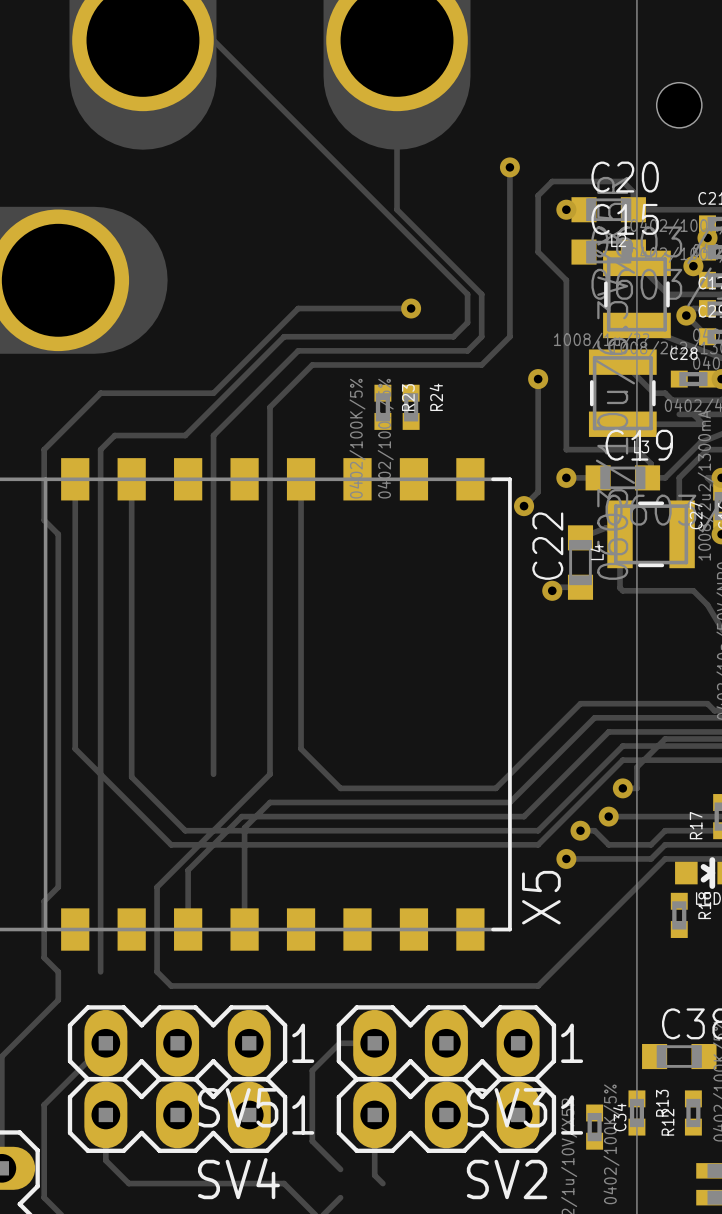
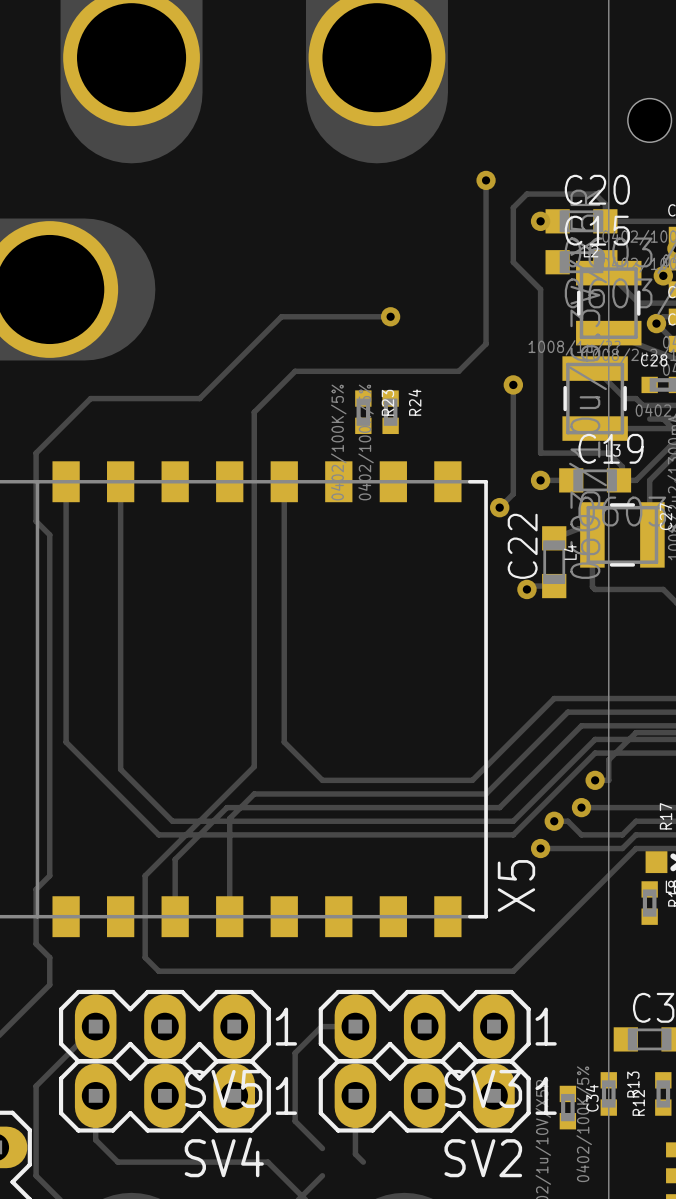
track: (142, 40) (213, 40) (467, 294) (467, 322) (453, 336) (284, 336) (185, 435) (114, 435) (100, 449) (100, 971) -> none
track: (397, 40) (397, 209) (481, 294) (481, 336) (467, 350) (298, 350) (213, 435) (213, 774) -> none

